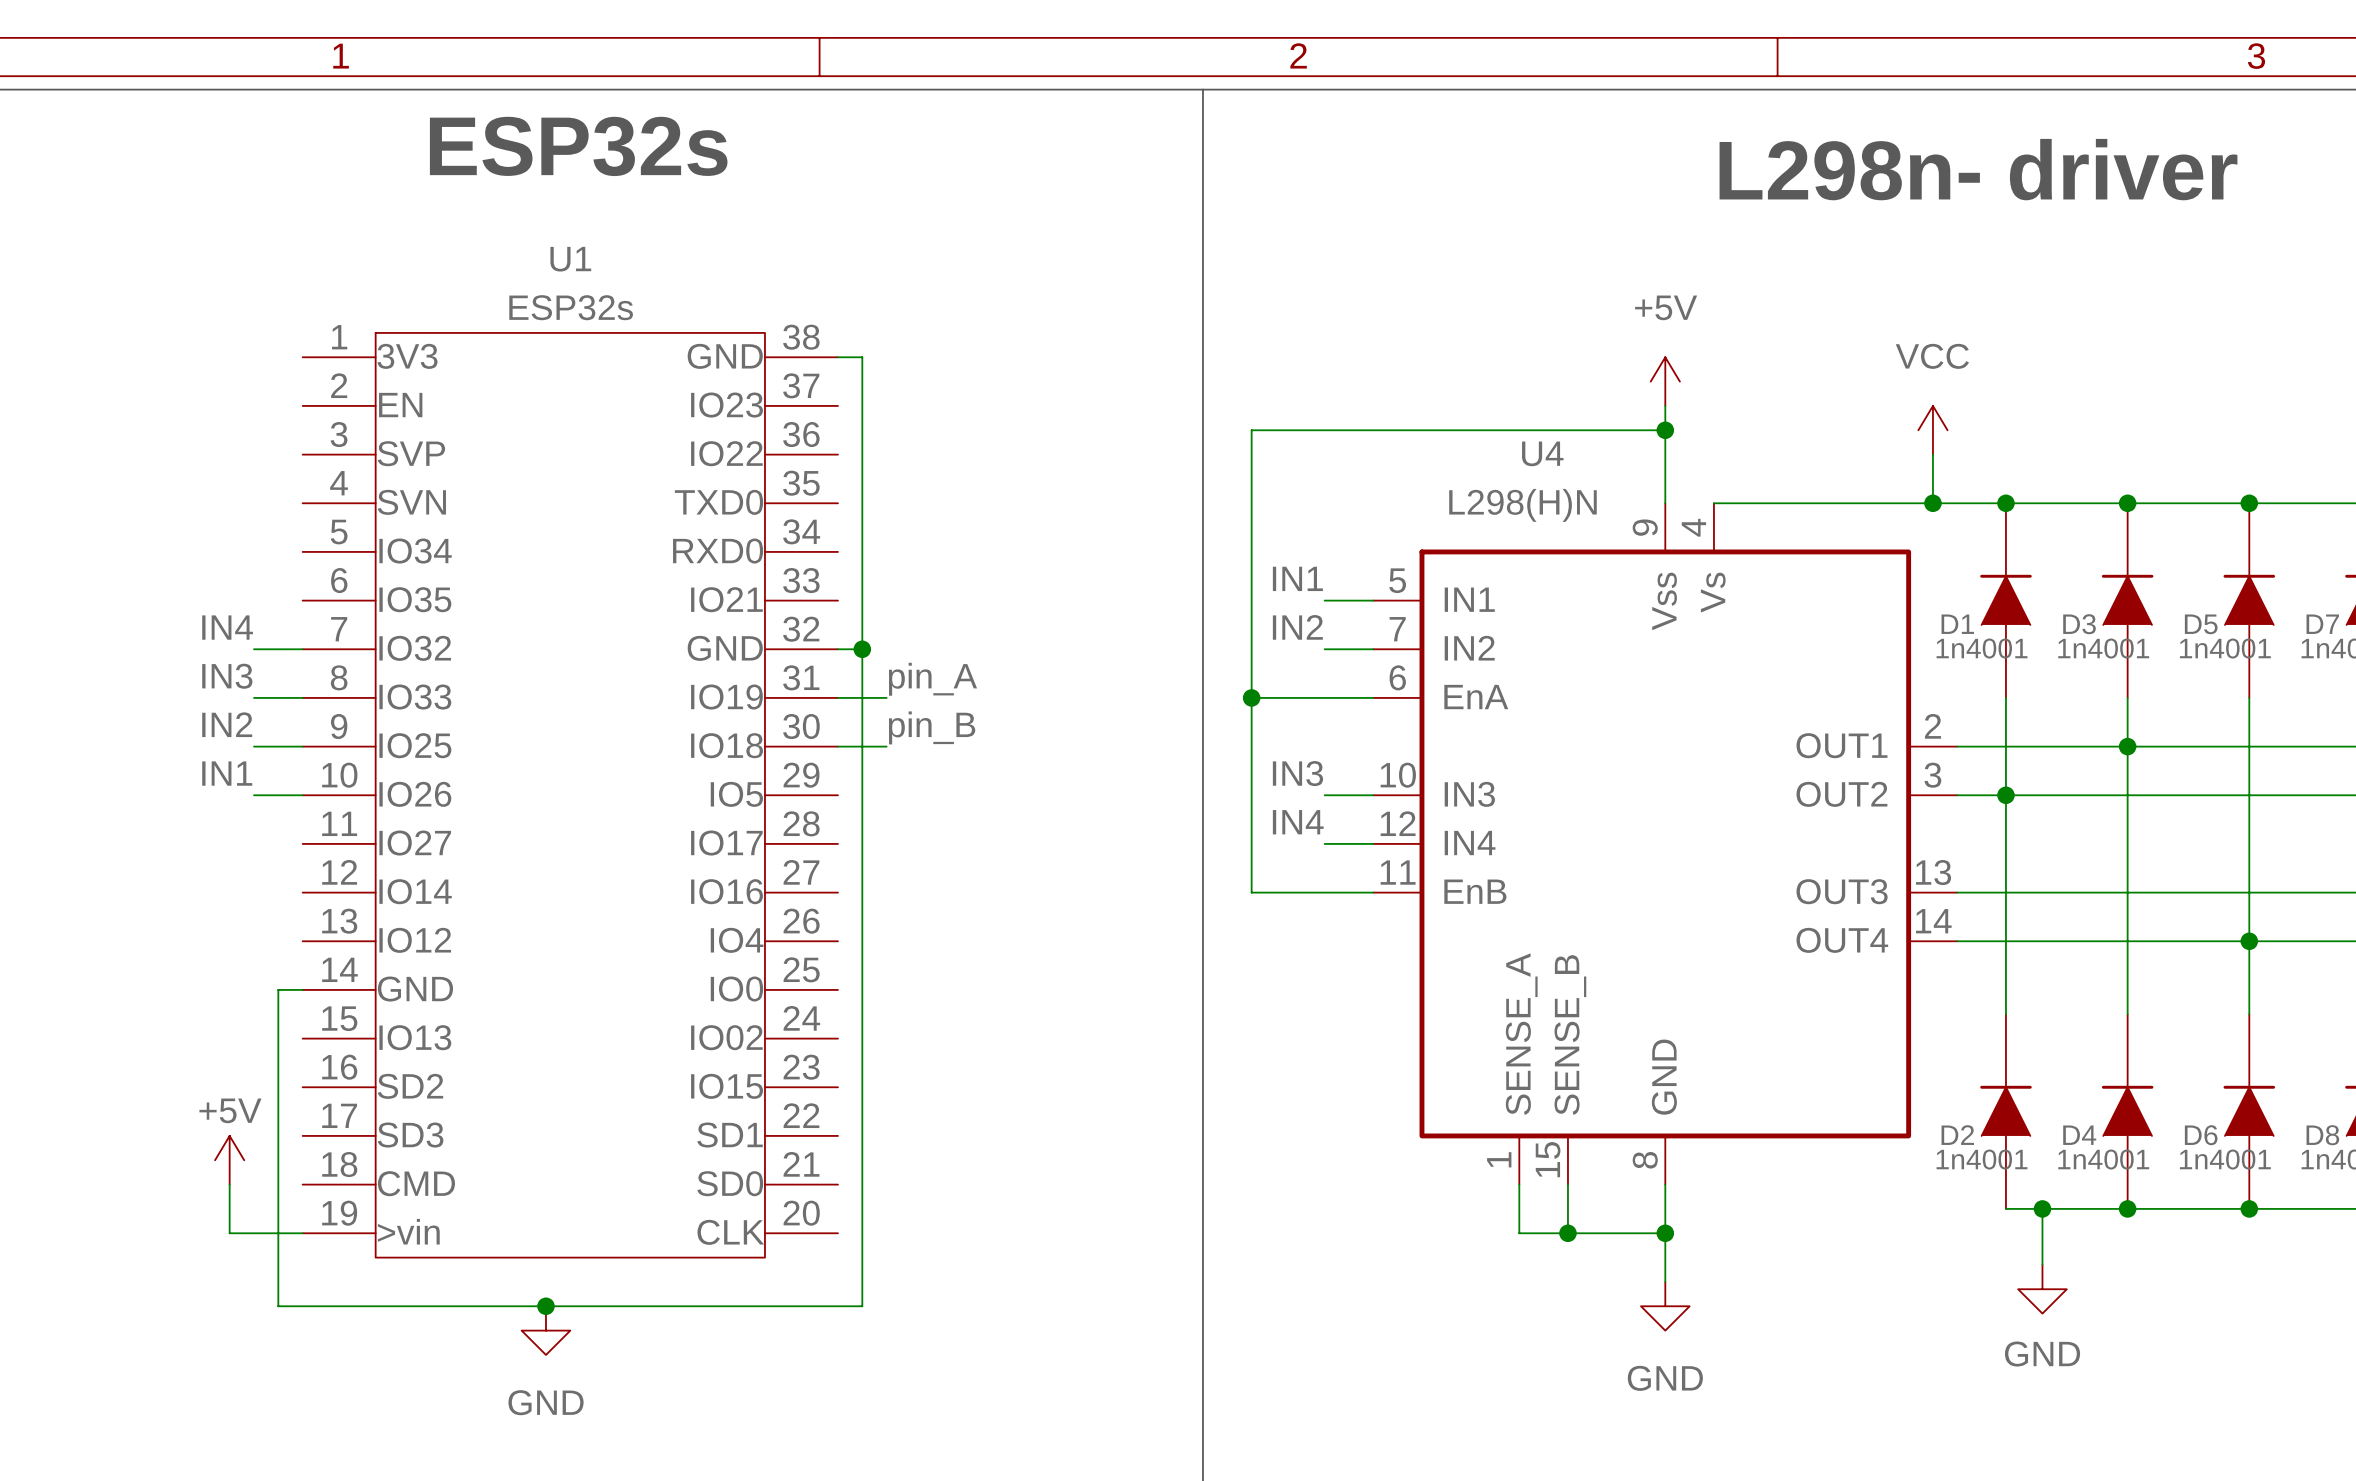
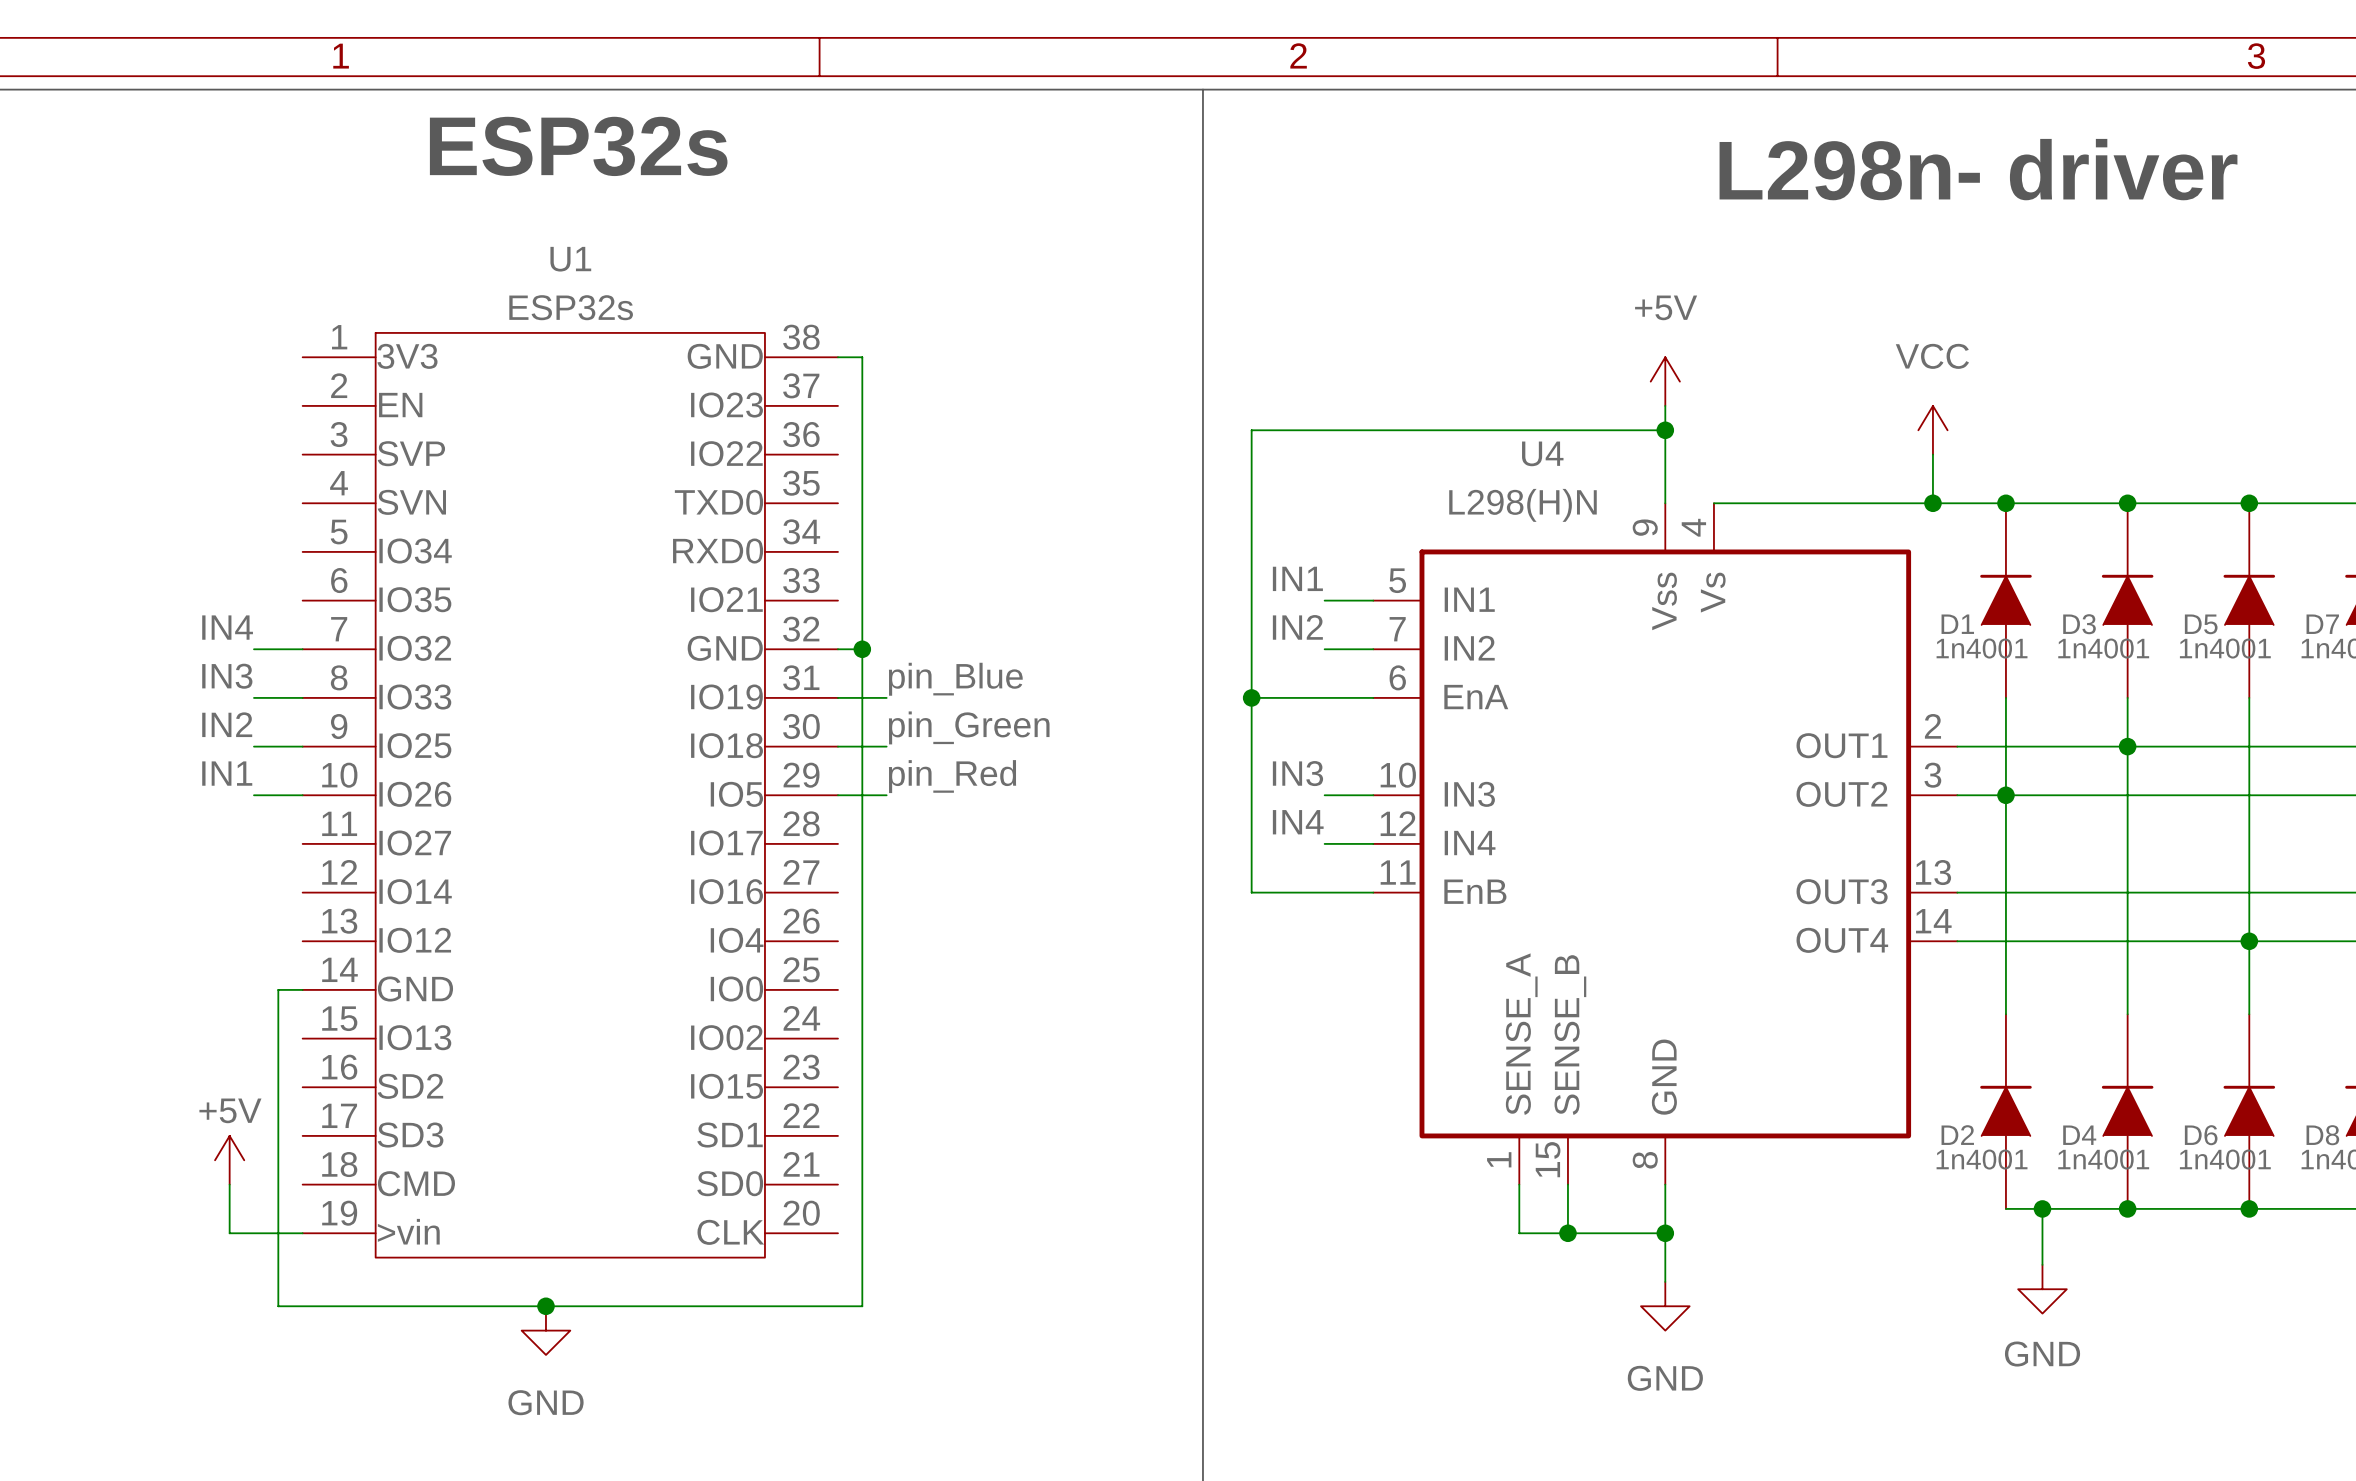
label: pin_A (932, 679) -> pin_Blue (955, 679)
label: pin_B (932, 727) -> pin_Green (969, 727)
label: none -> pin_Red (952, 776)
wire: none -> (837, 795) (886, 795)

